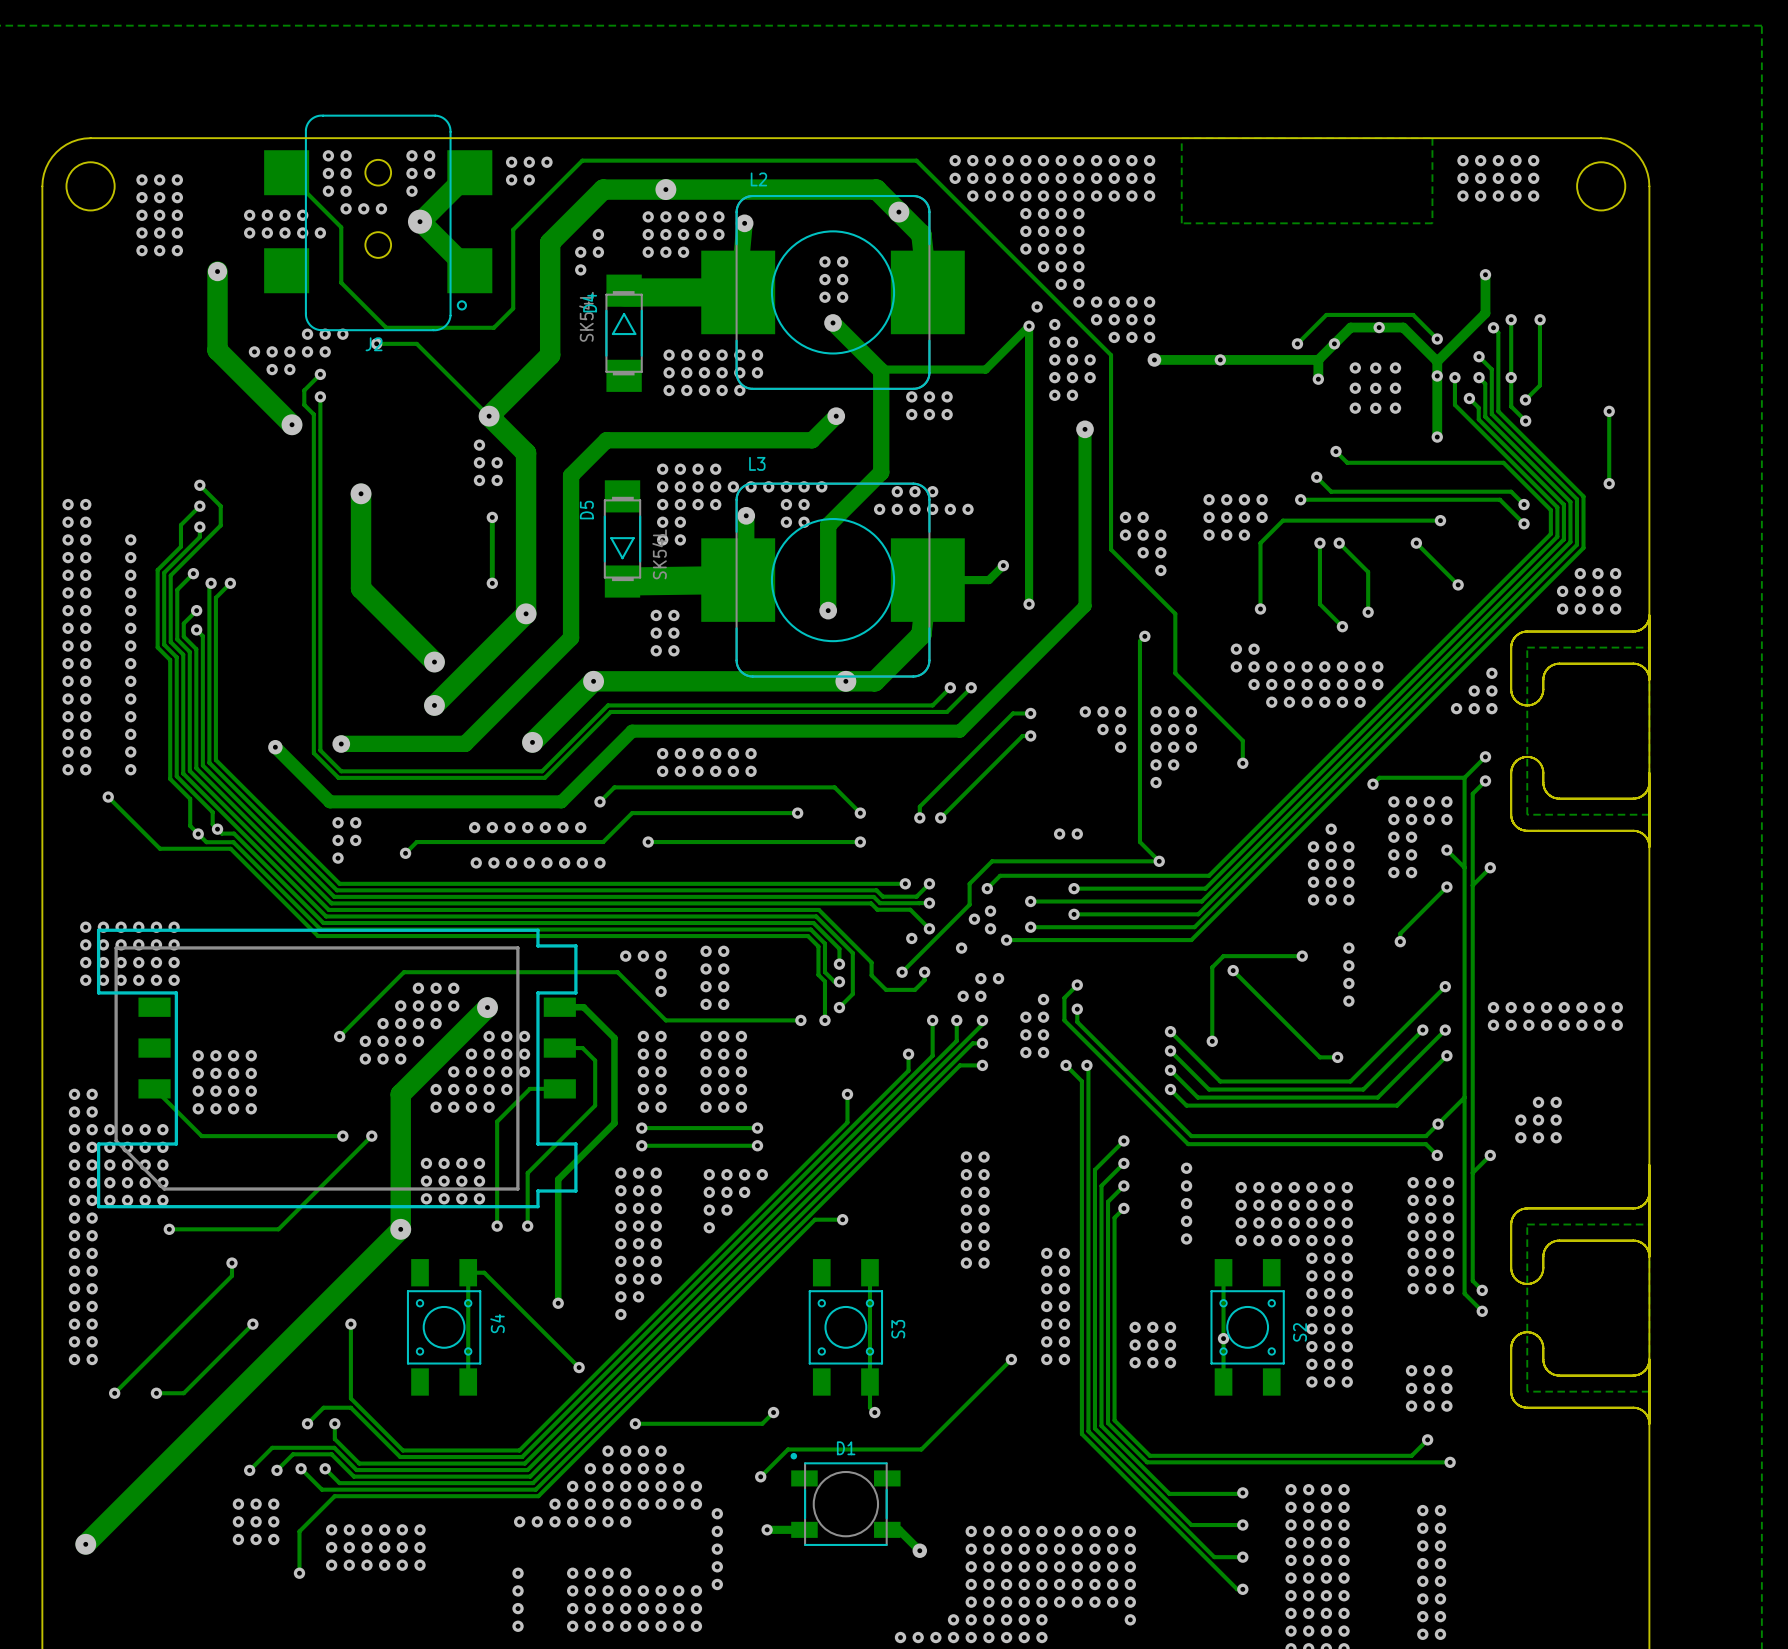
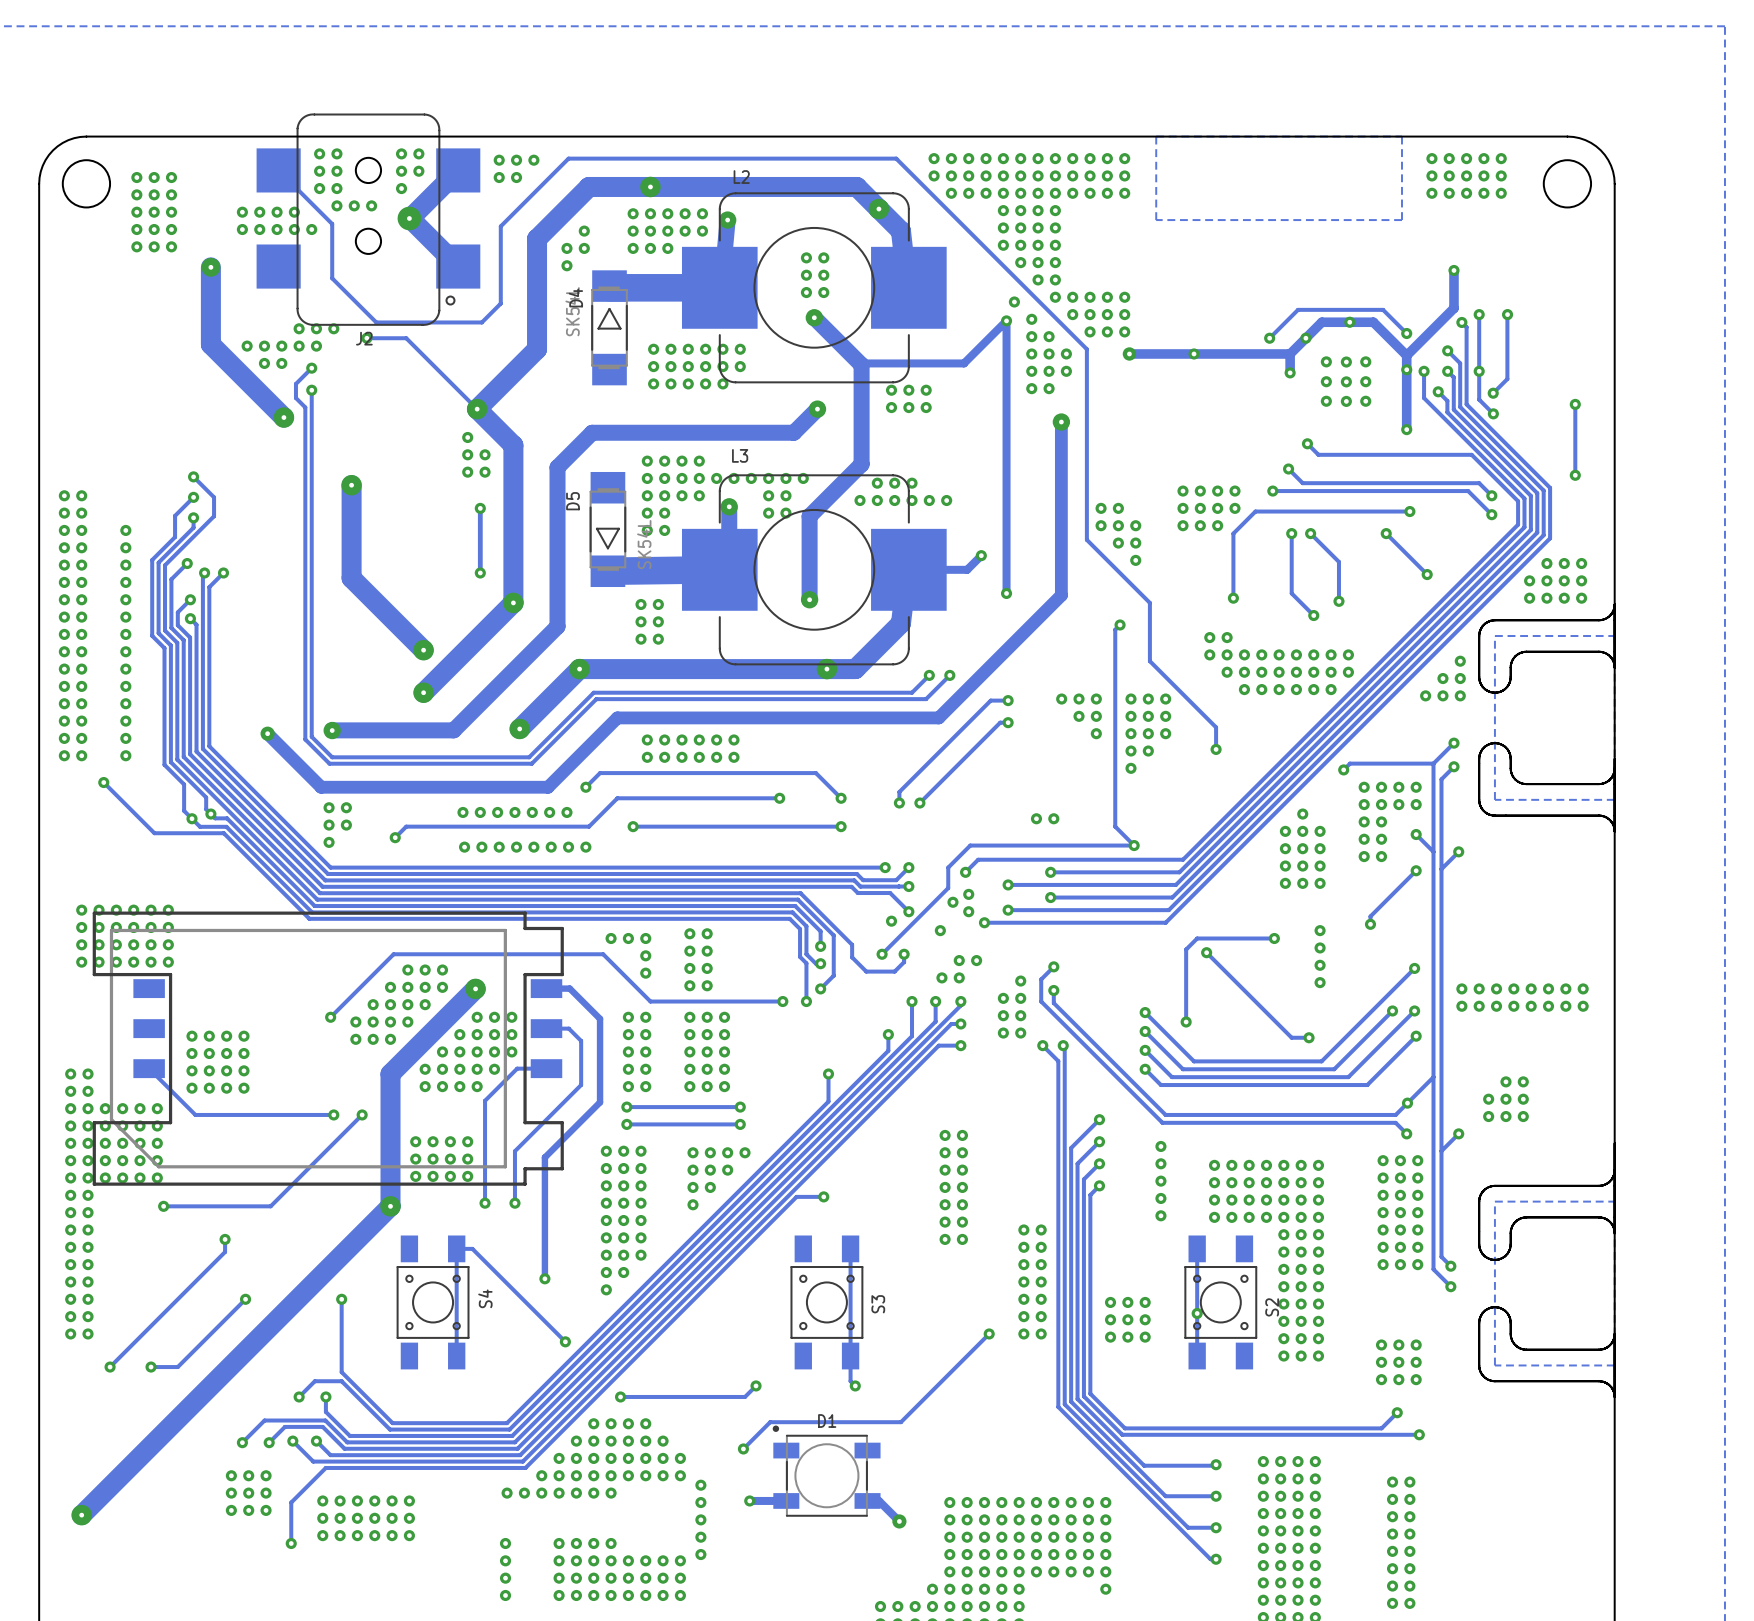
L2 footprint: [701, 194, 965, 390] -> [681, 192, 947, 384]
L3 footprint: [701, 482, 965, 678] -> [681, 474, 947, 666]

